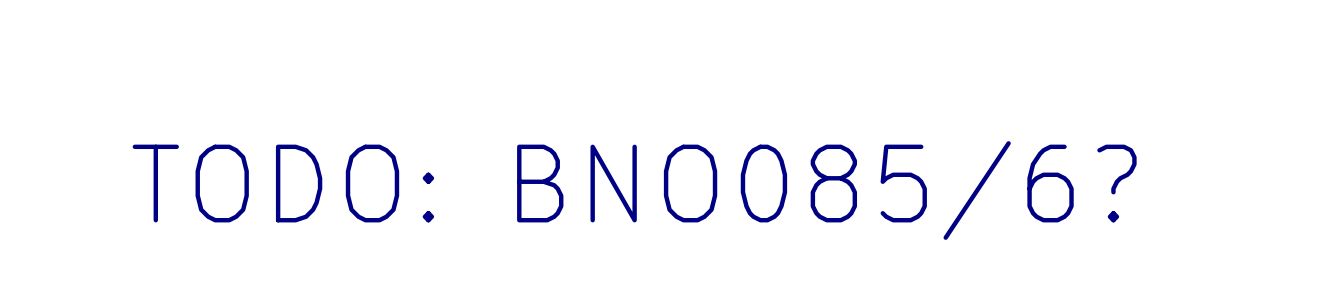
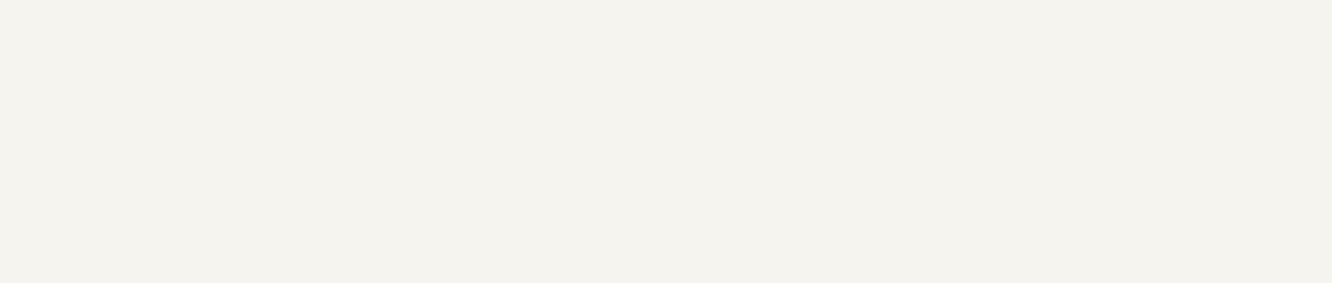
text: TODO: BNO085/6? (634, 190) -> none

